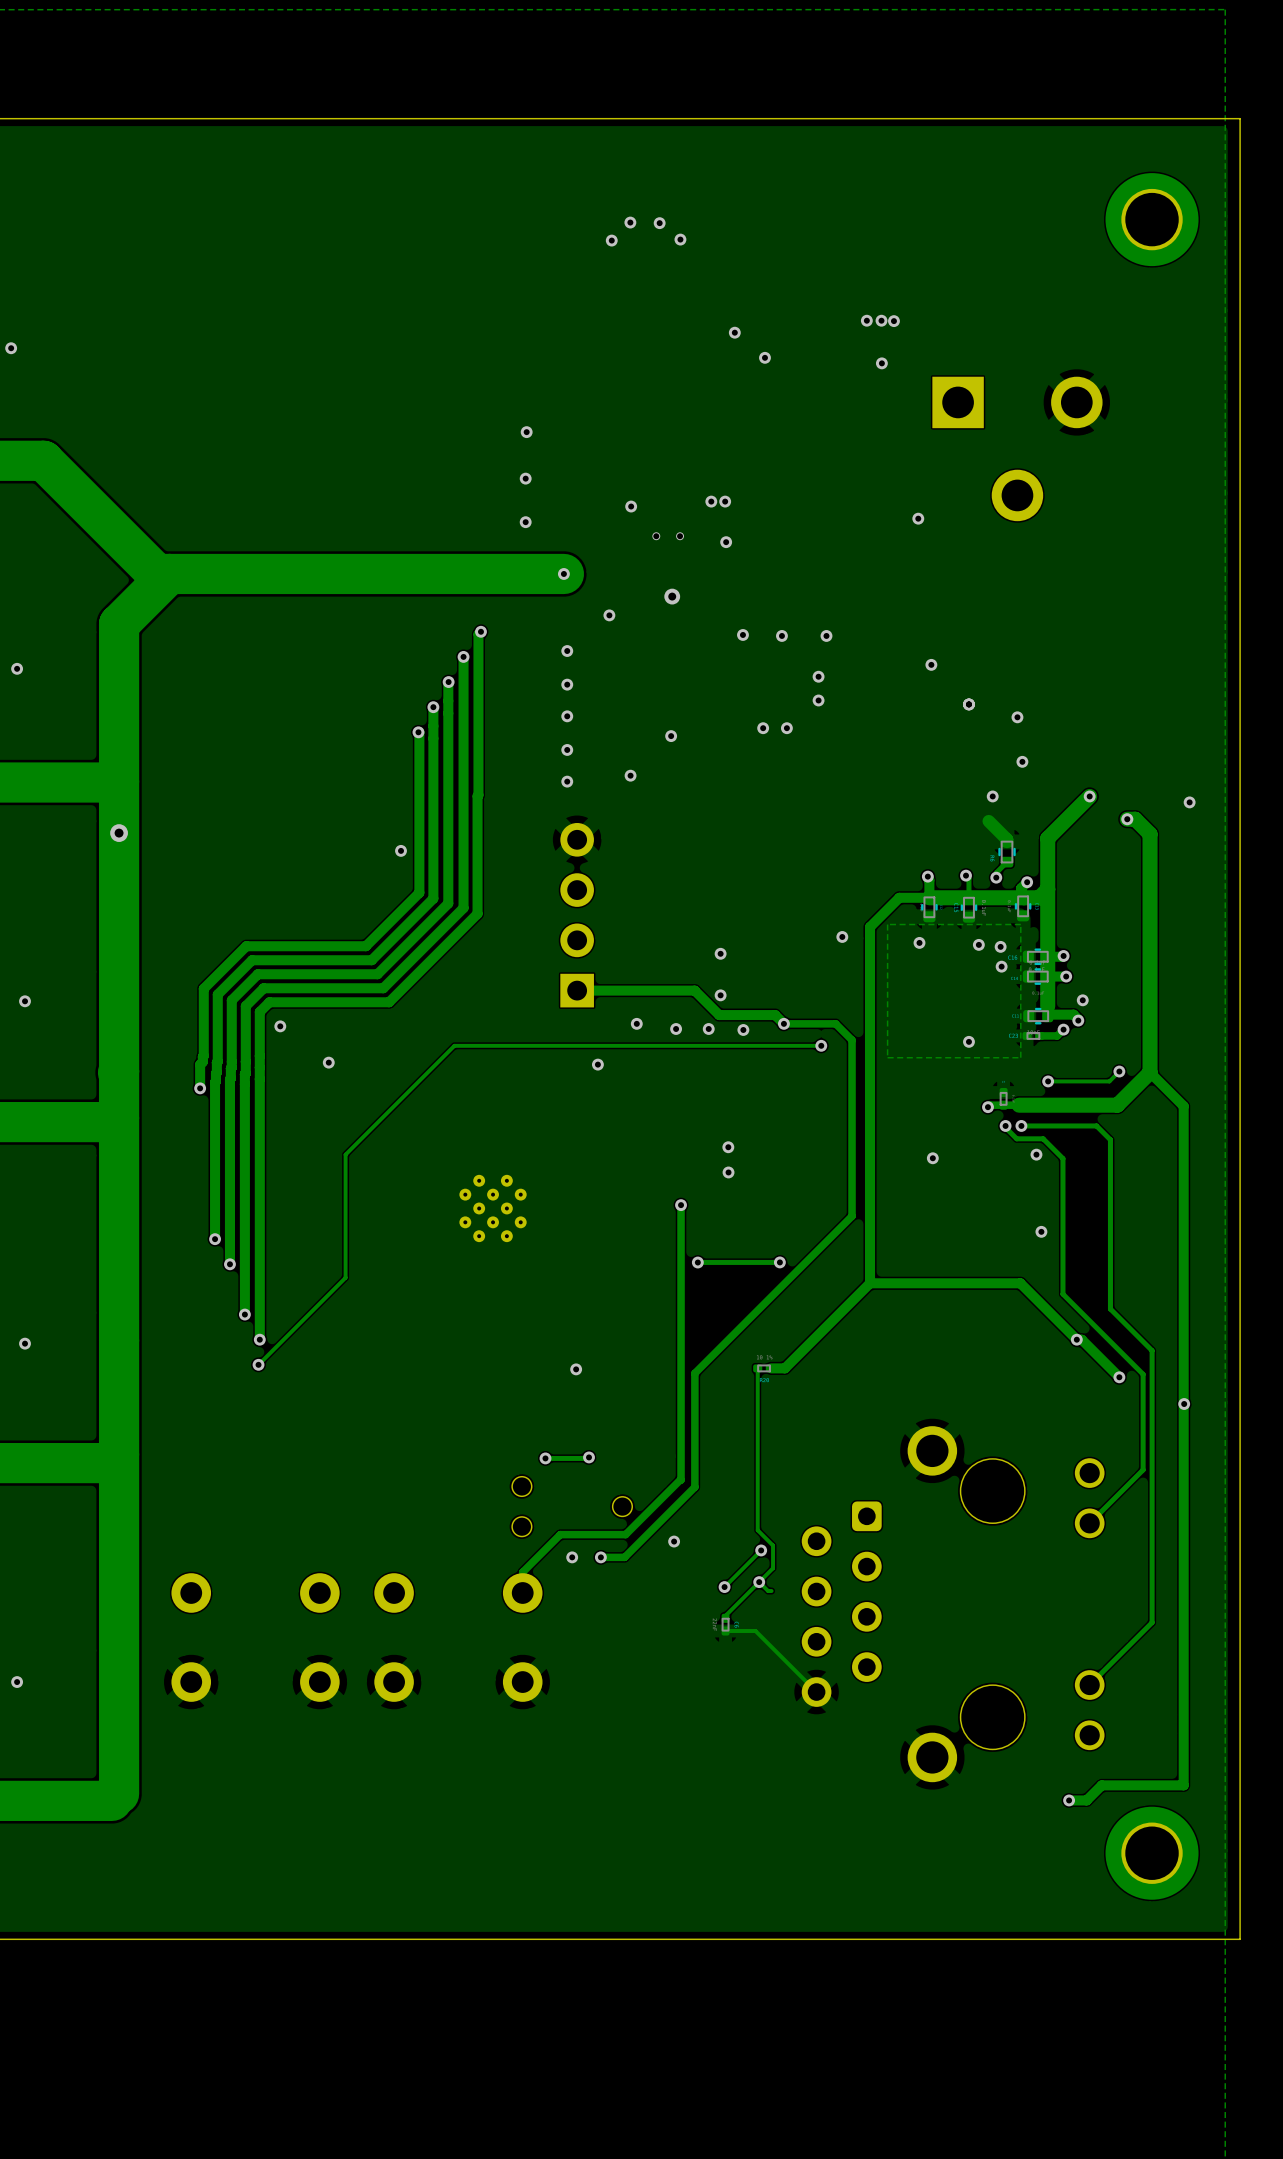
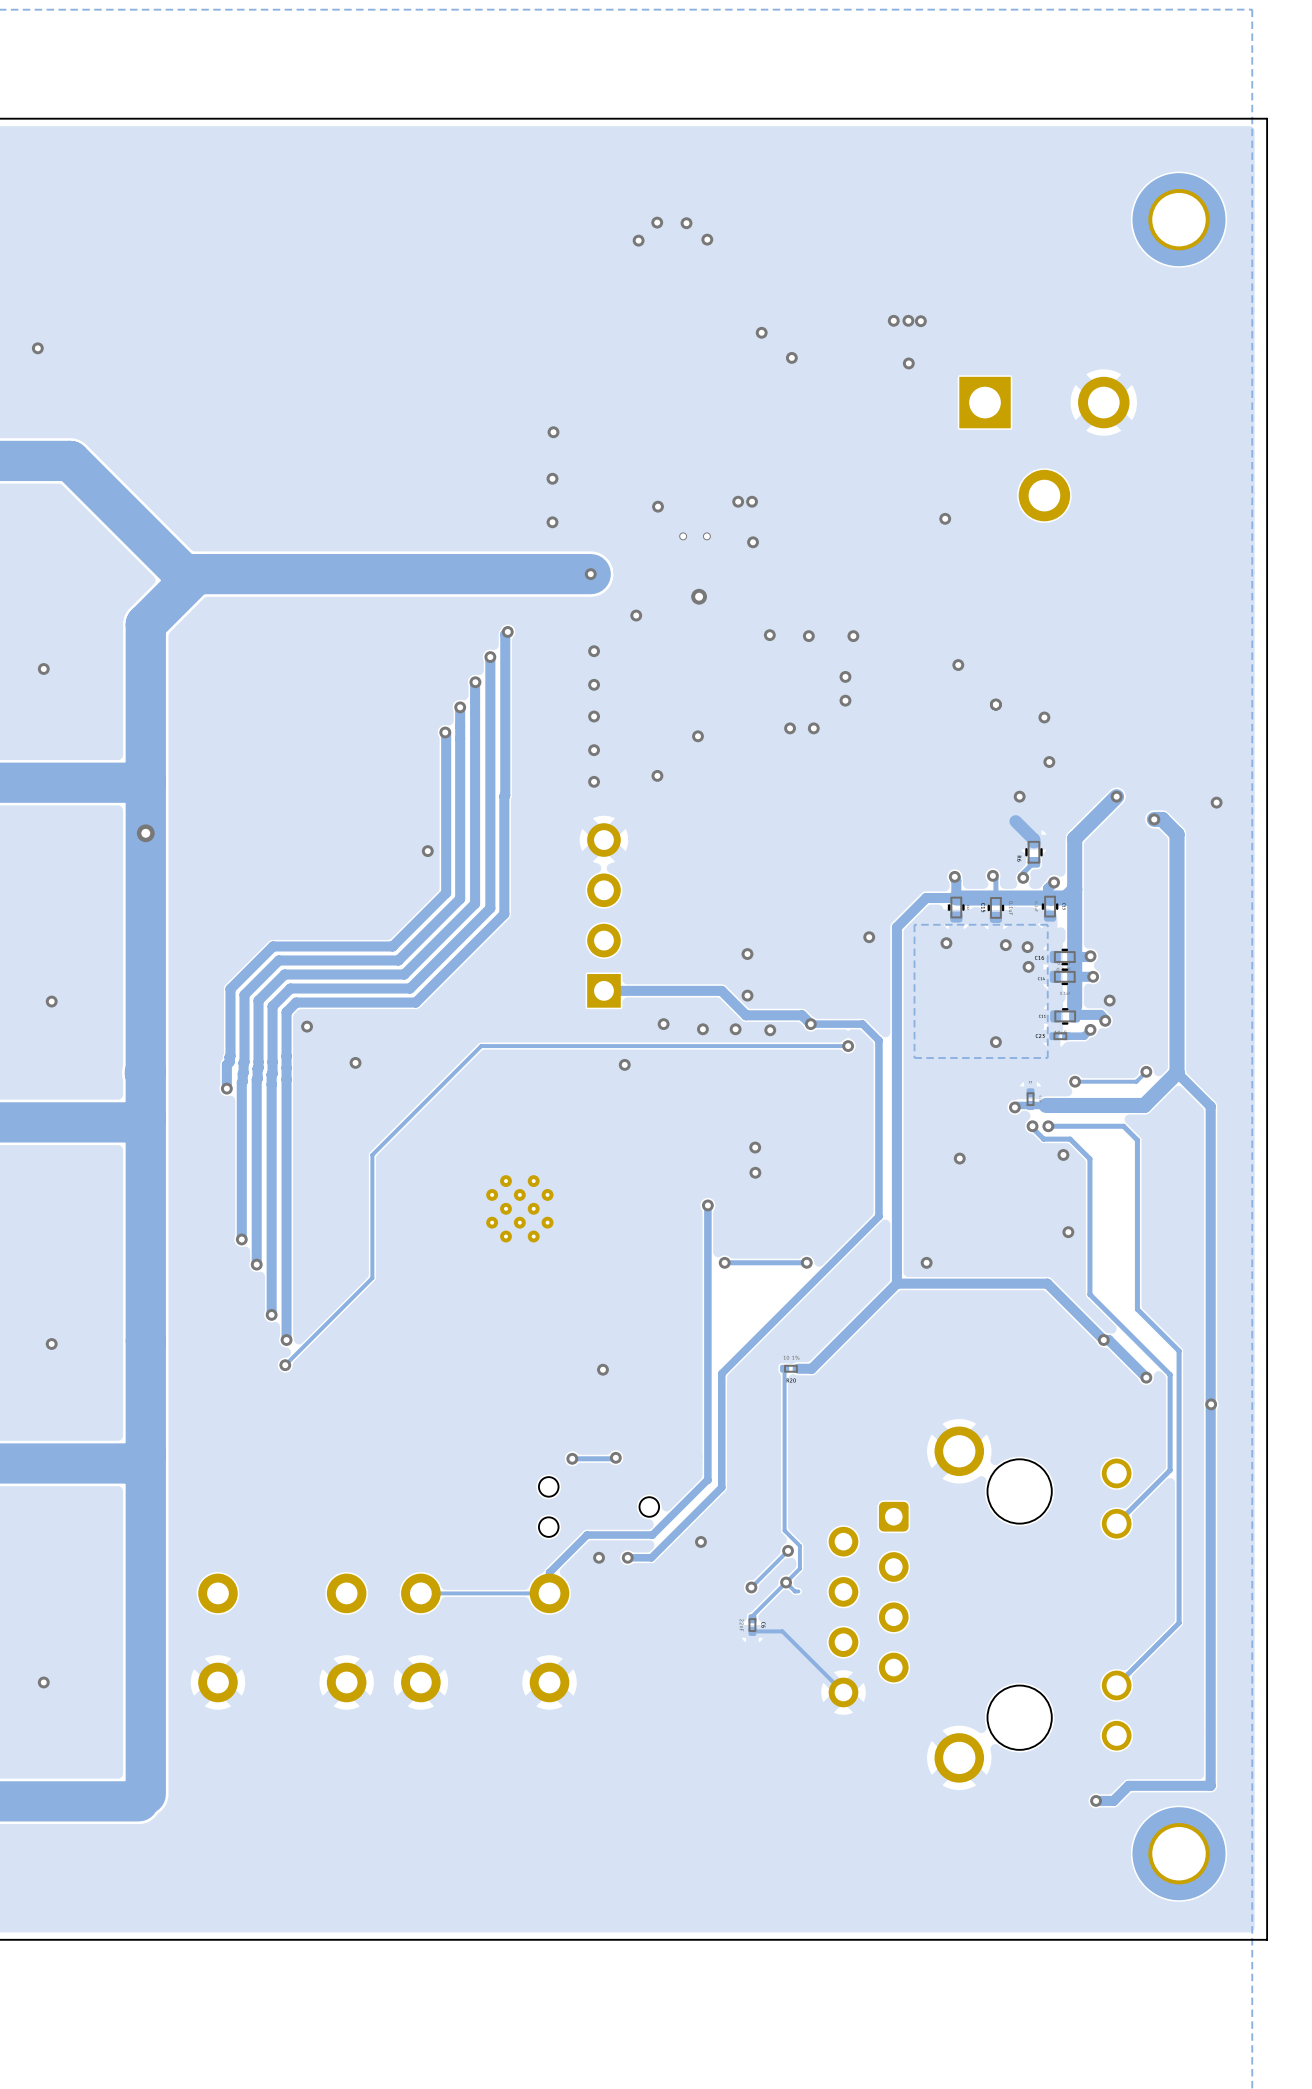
via: none -> (926, 1262)
track: none -> (549, 1593) (420, 1593)

